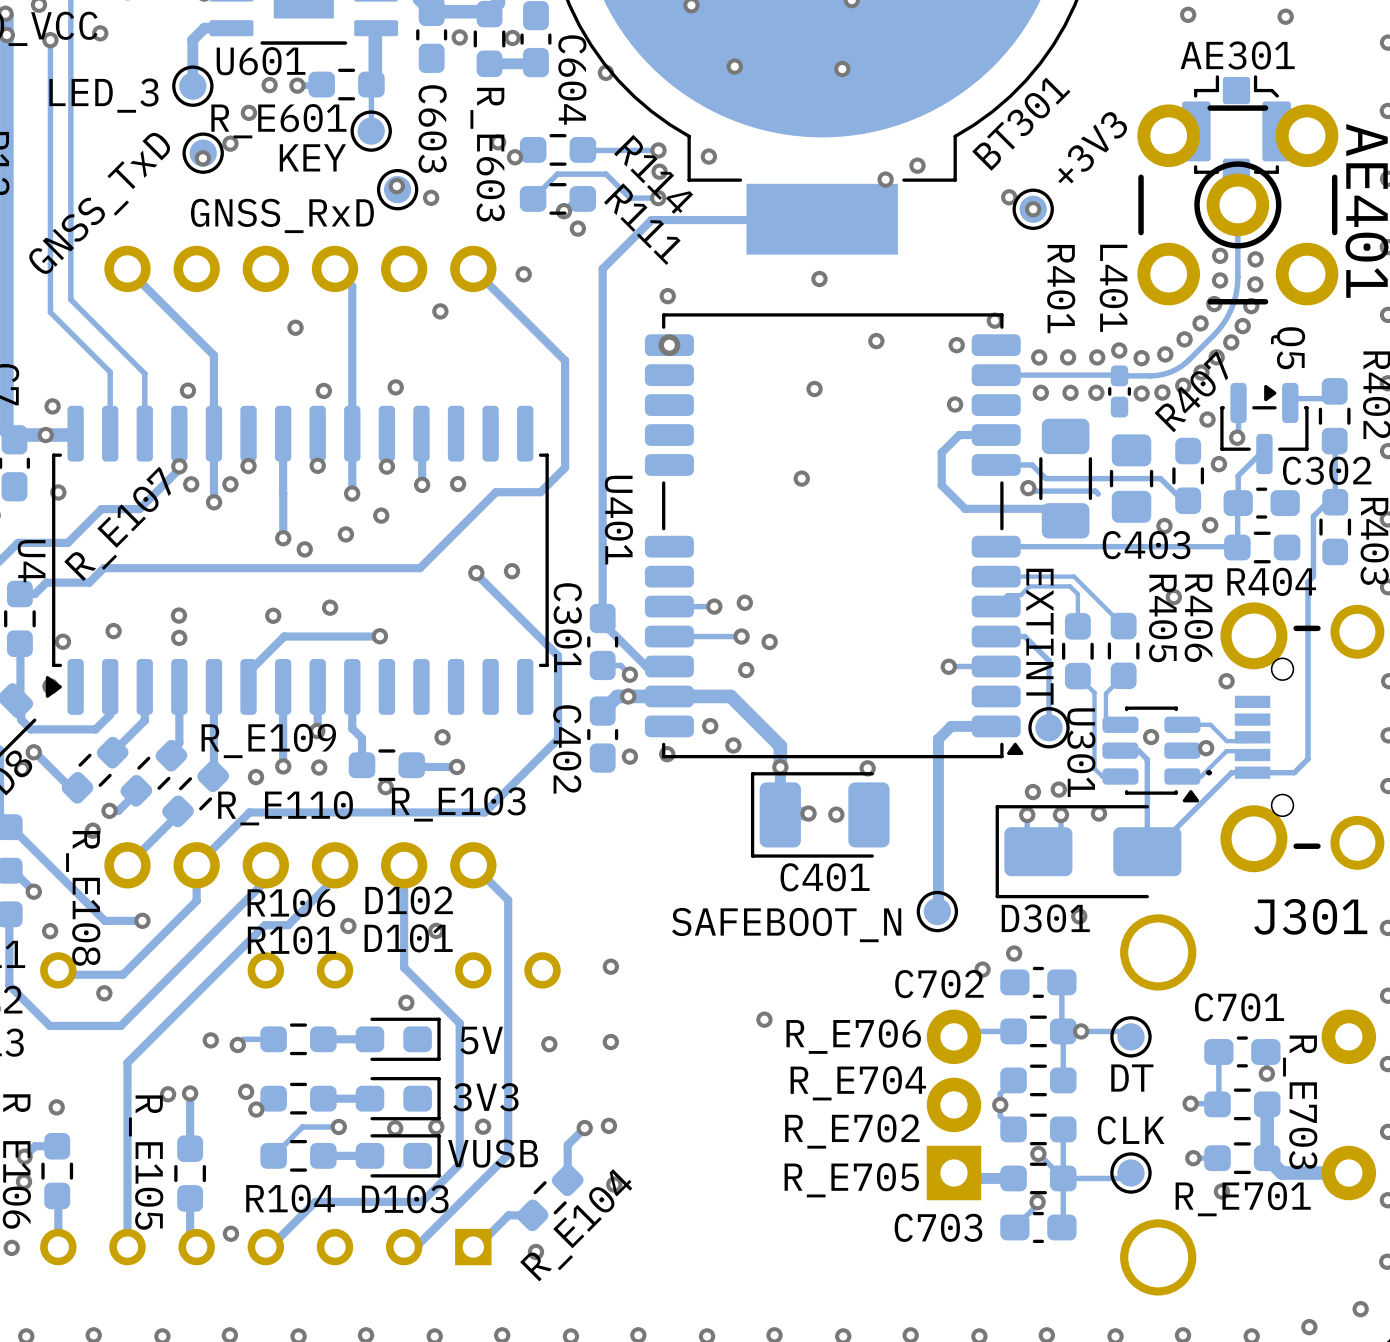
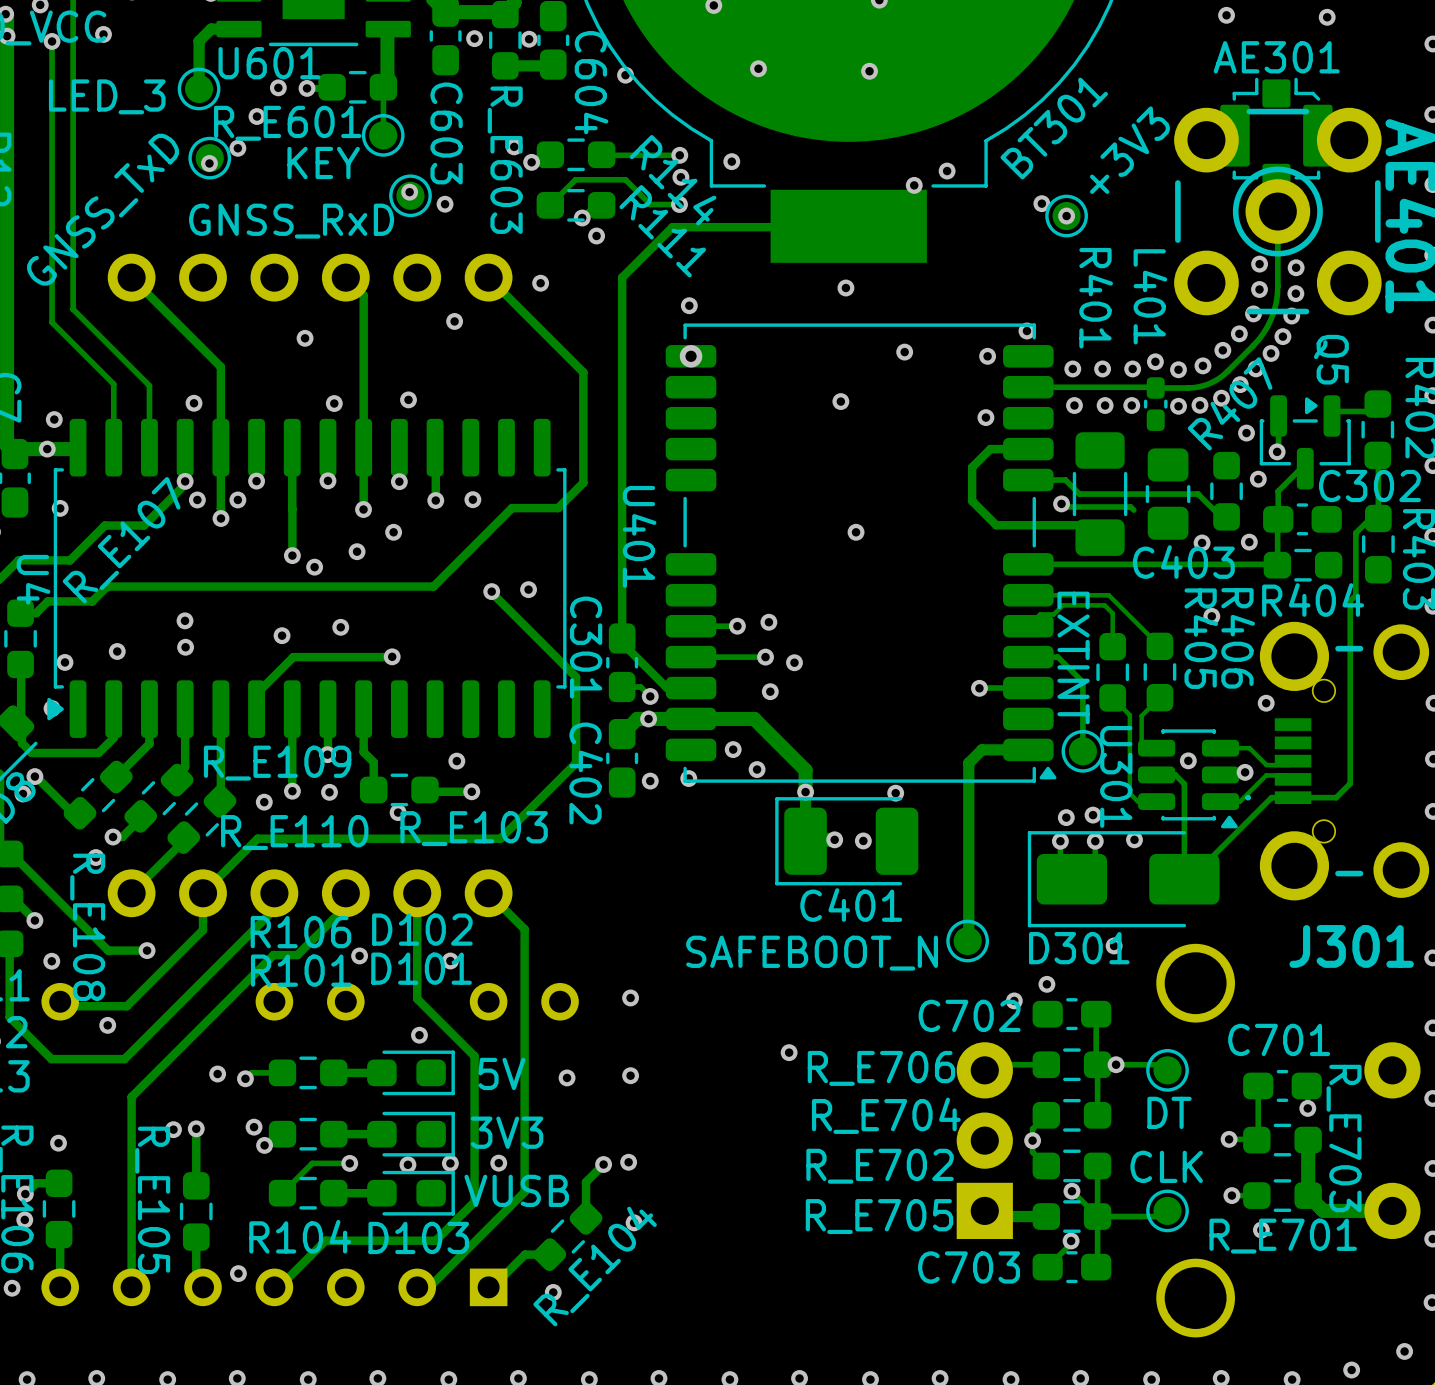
via position: (801, 478) -> (856, 532)
via: none -> (185, 620)
via: (178, 615) -> none
via: none -> (185, 647)
via: (179, 637) -> none

